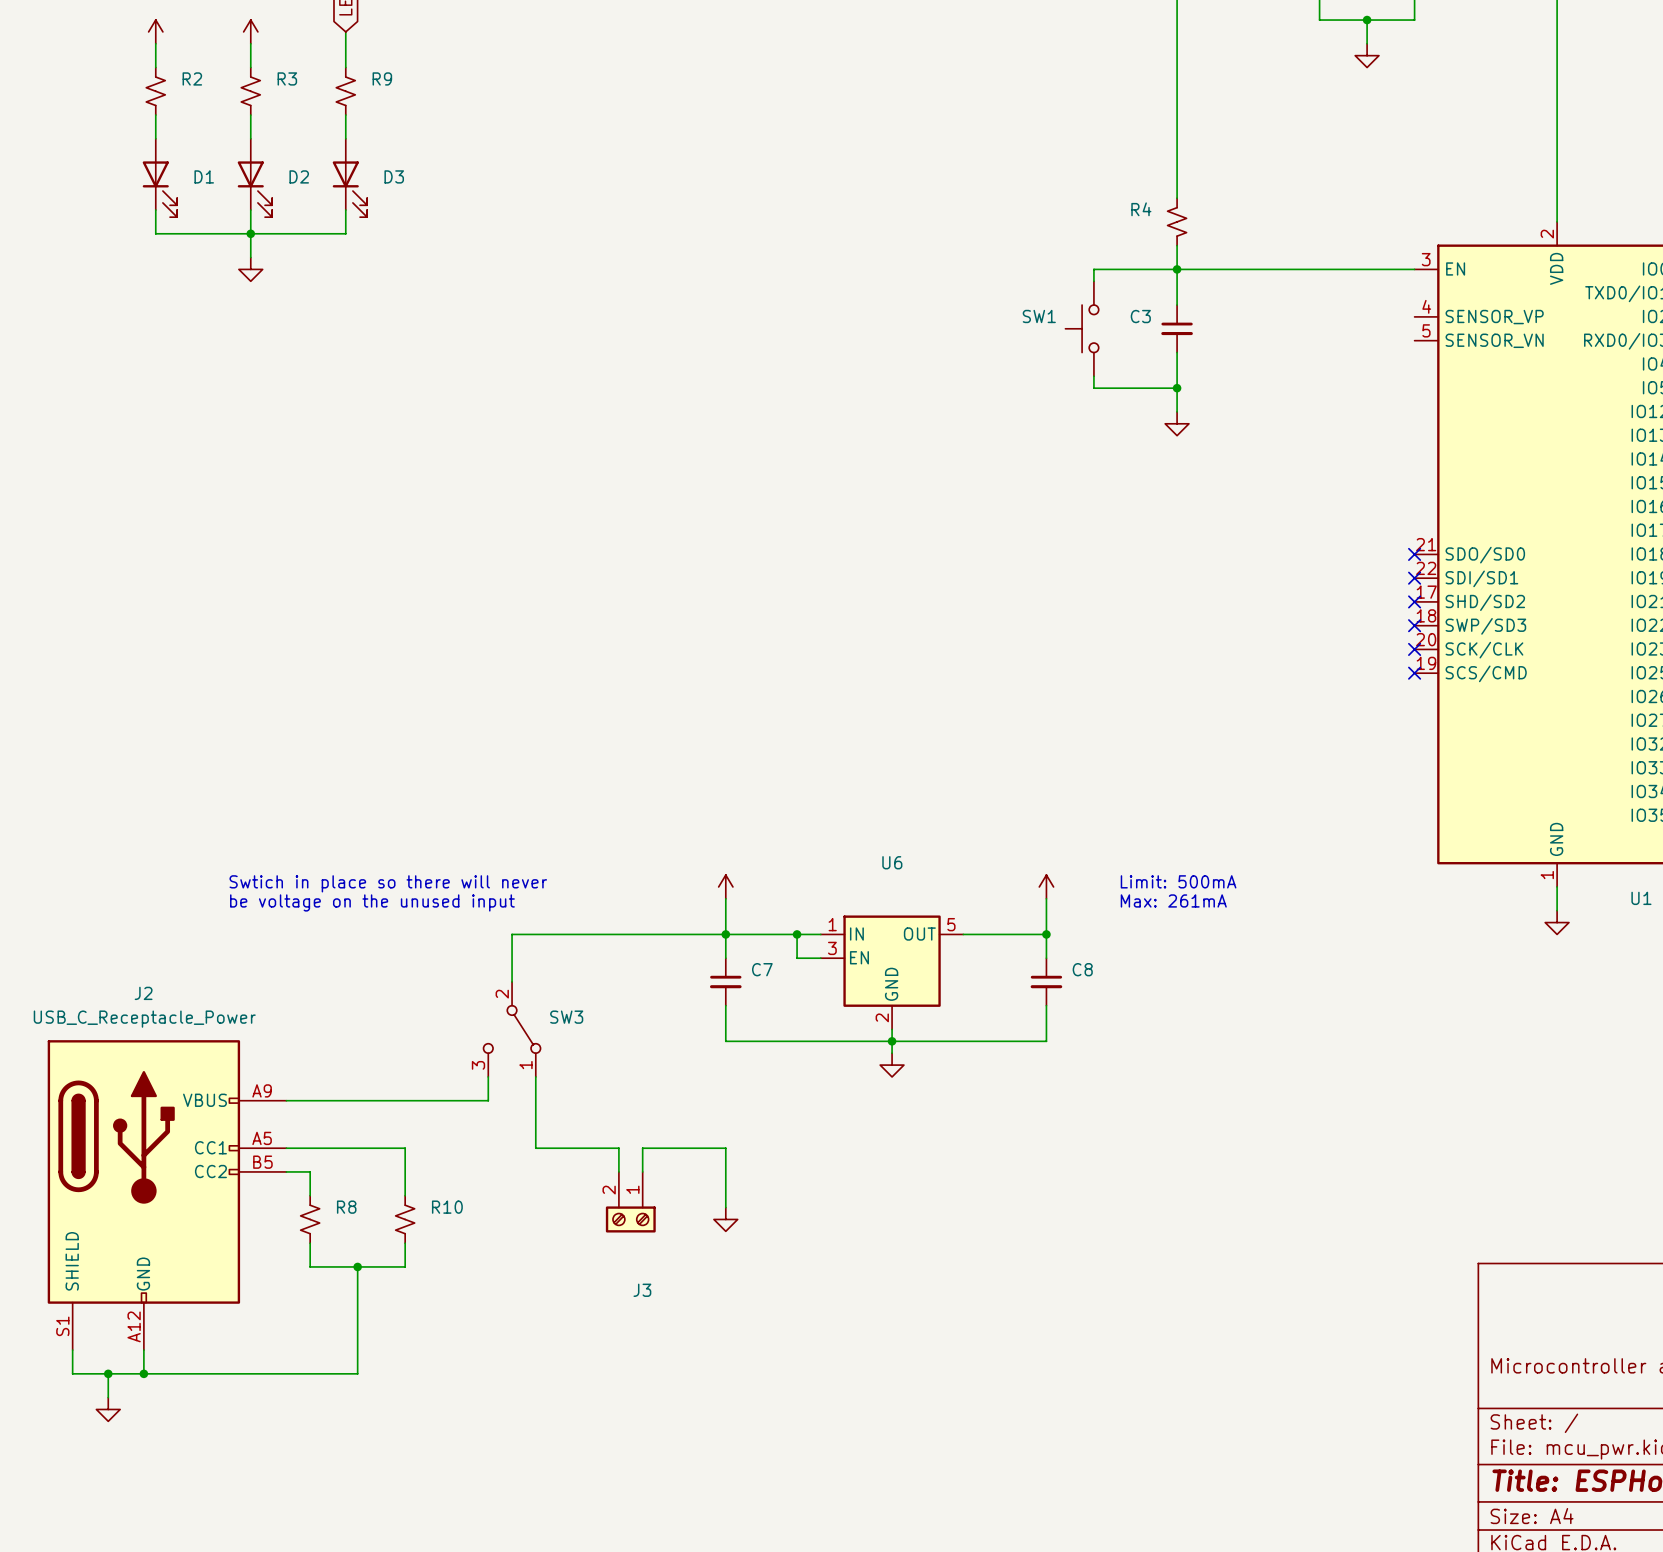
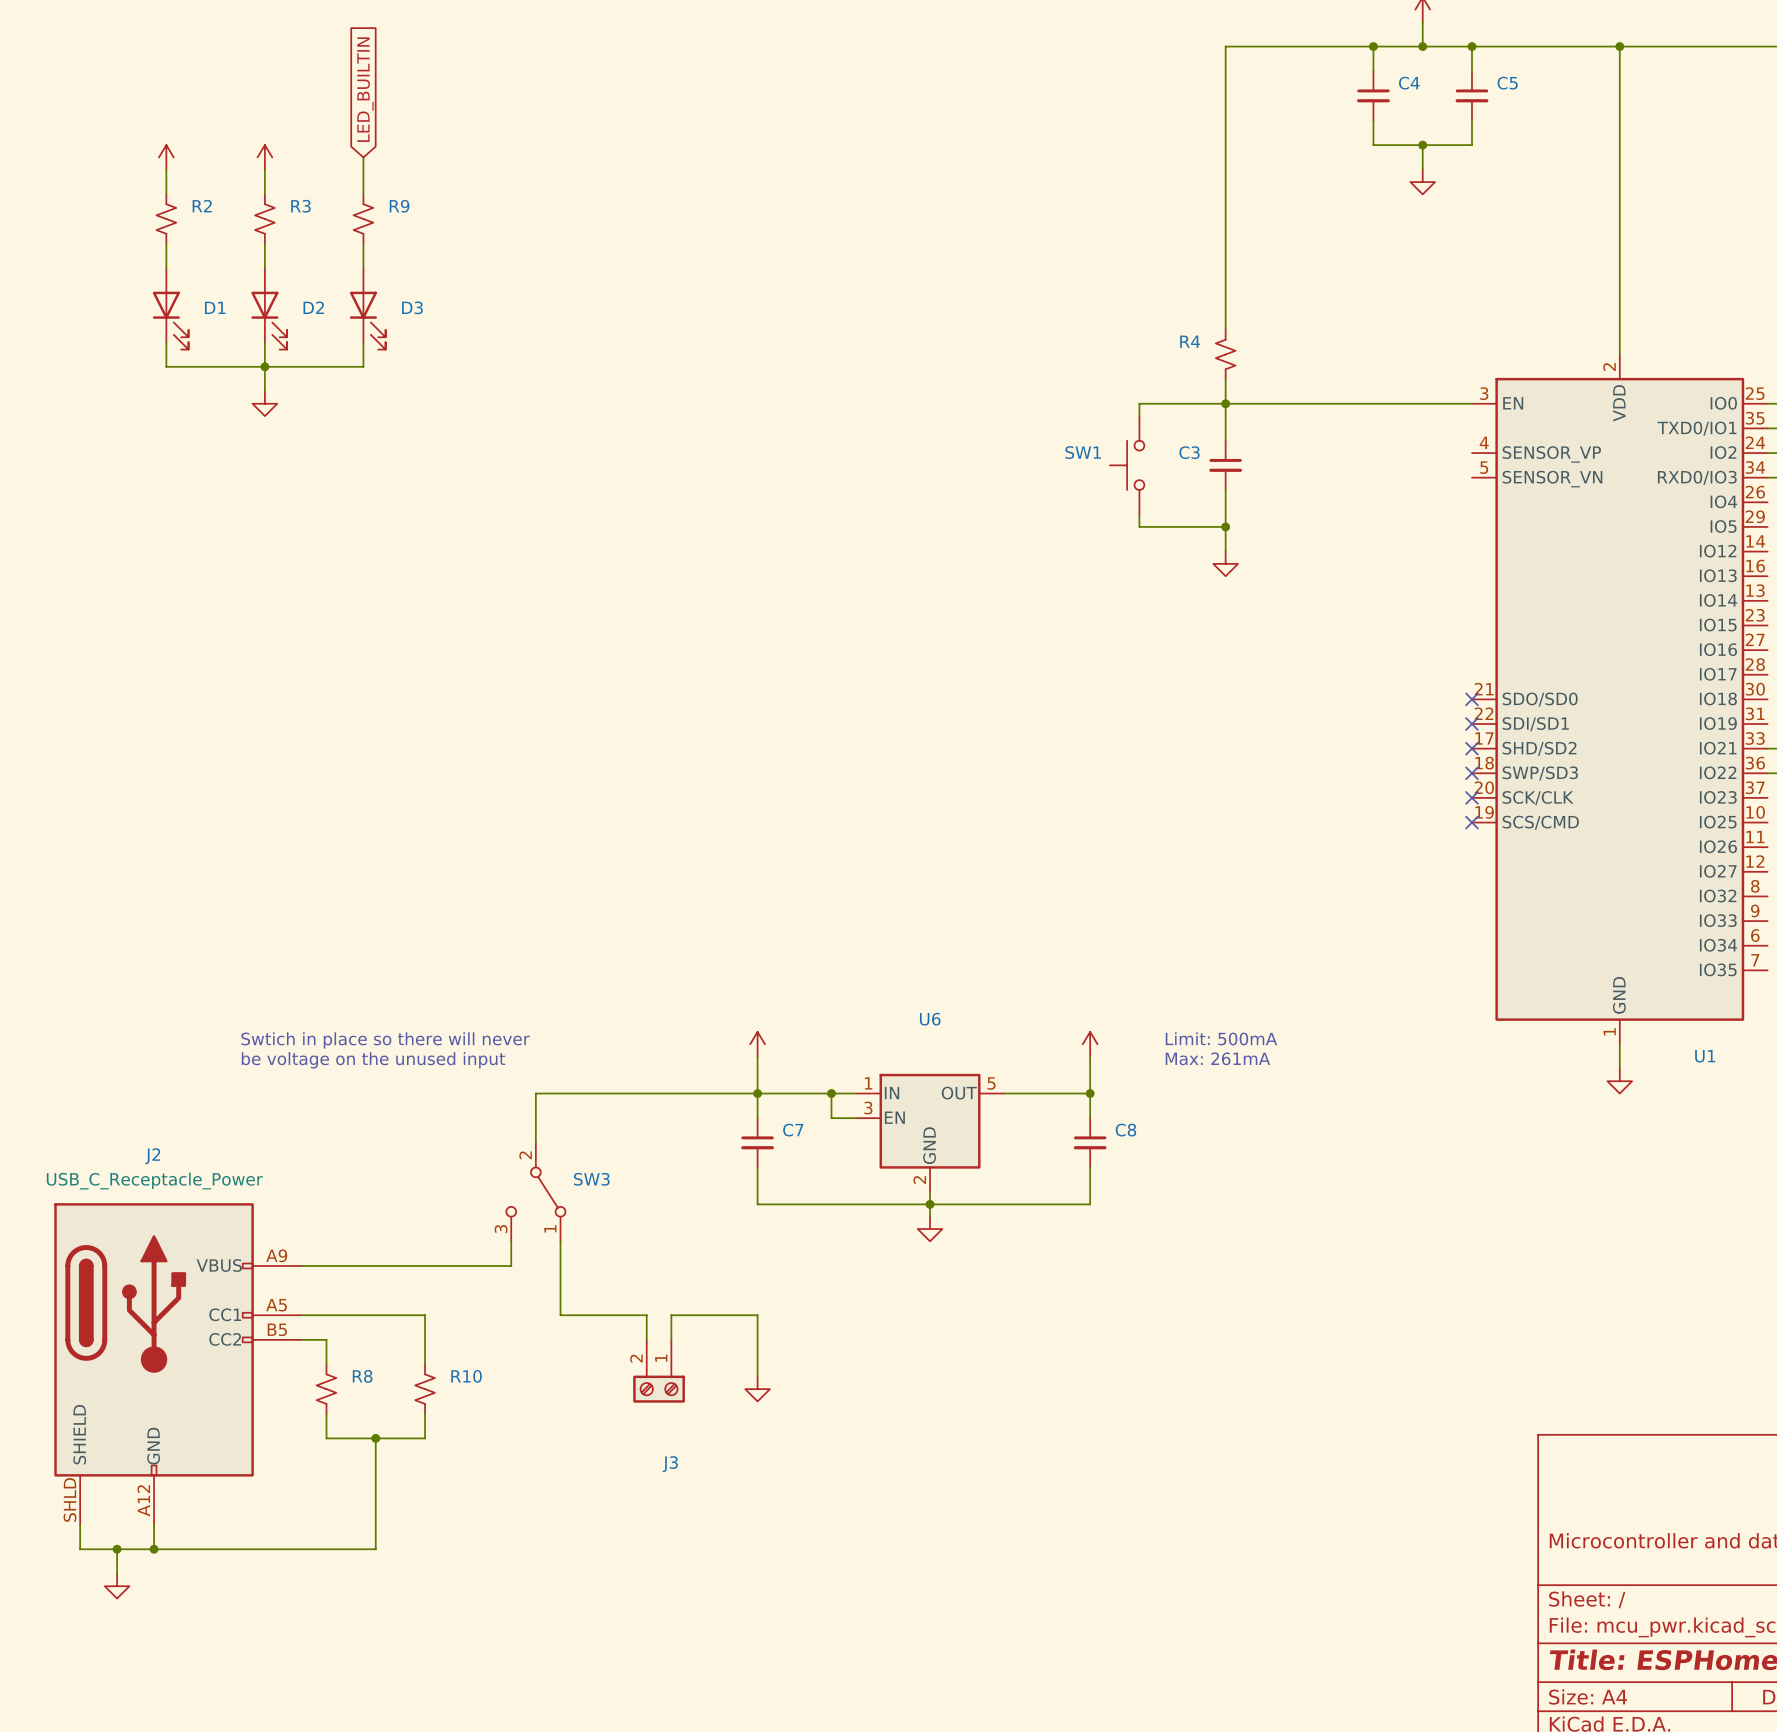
J2 pin number: S1 (62, 1326) -> SHLD (69, 1499)

